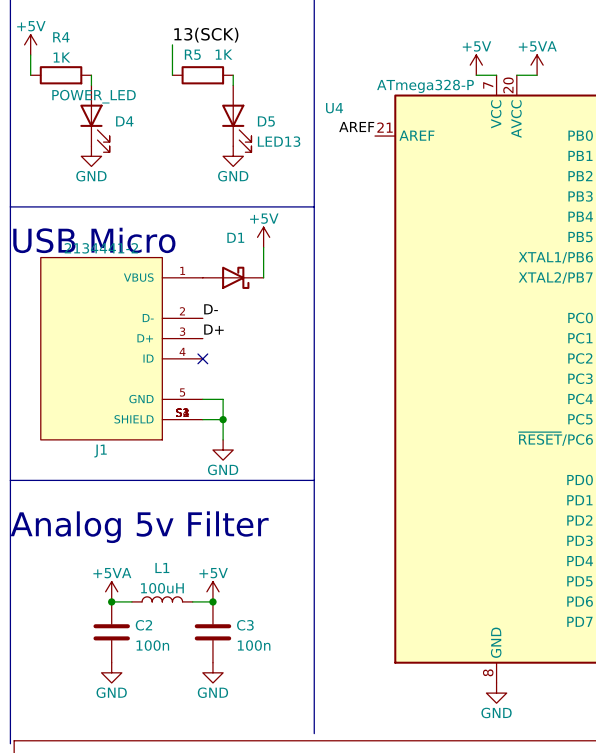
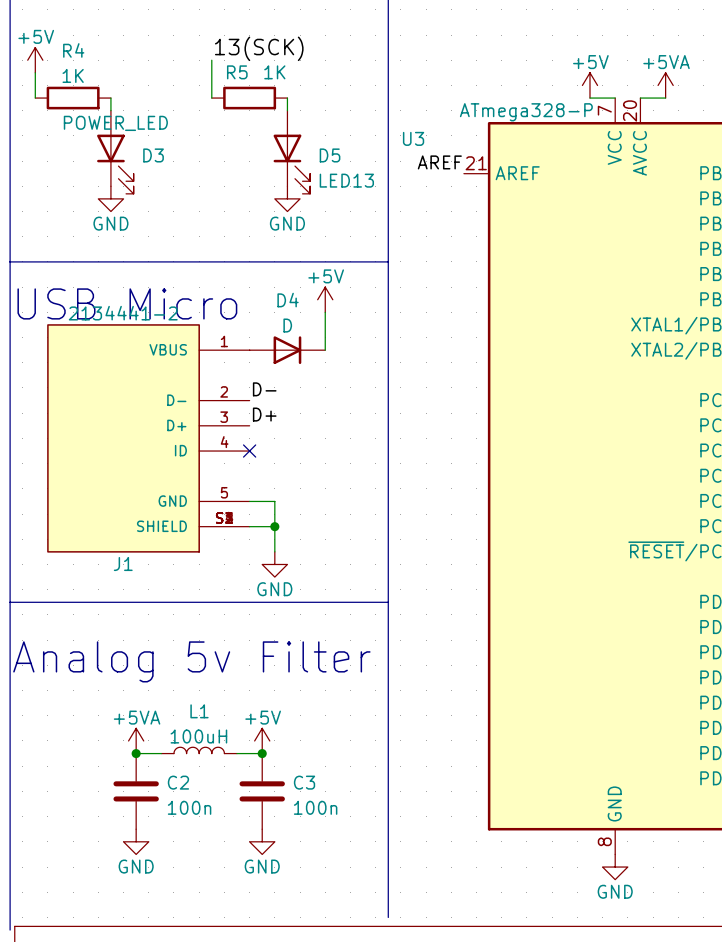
U4 name: U4 (334, 108) -> U3 (413, 138)
D4 name: D4 (124, 121) -> D3 (153, 155)
D1: (233, 277) -> none
D4: none -> D (287, 350)

